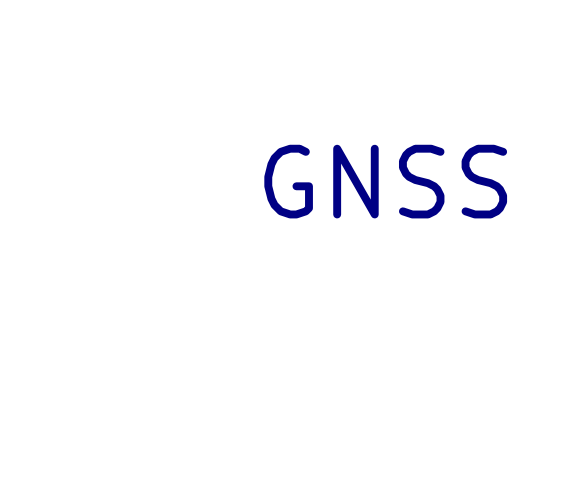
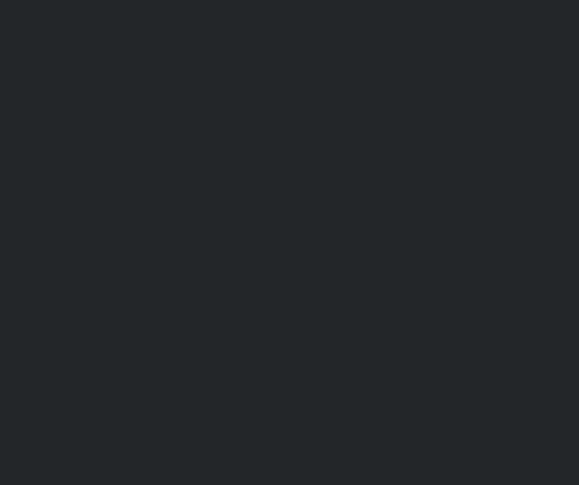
text: GNSS (385, 181) -> none

